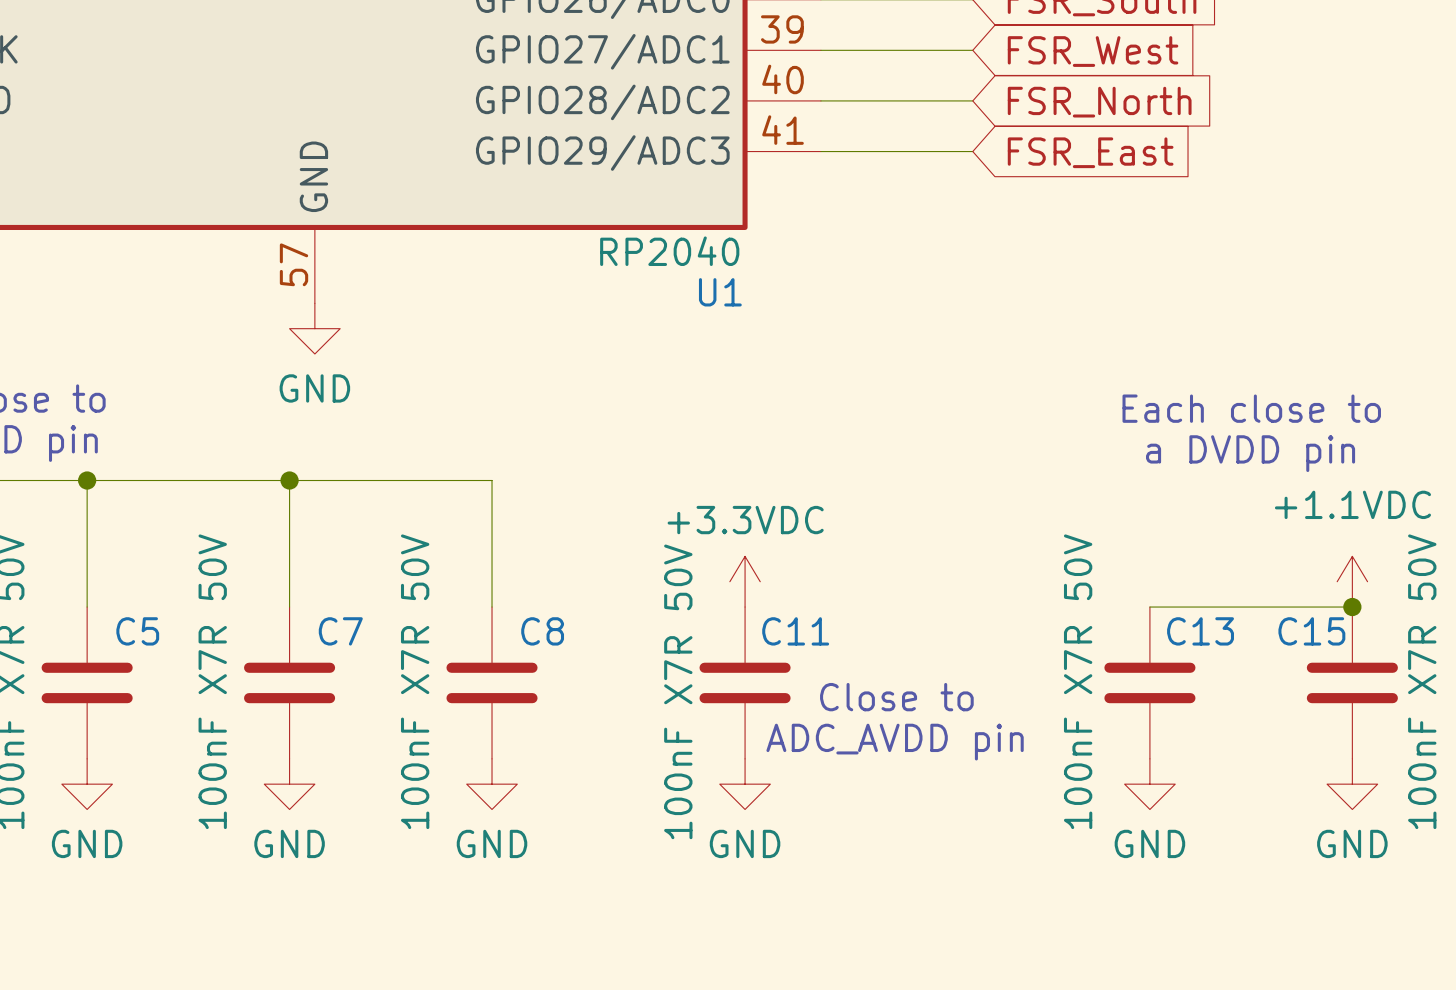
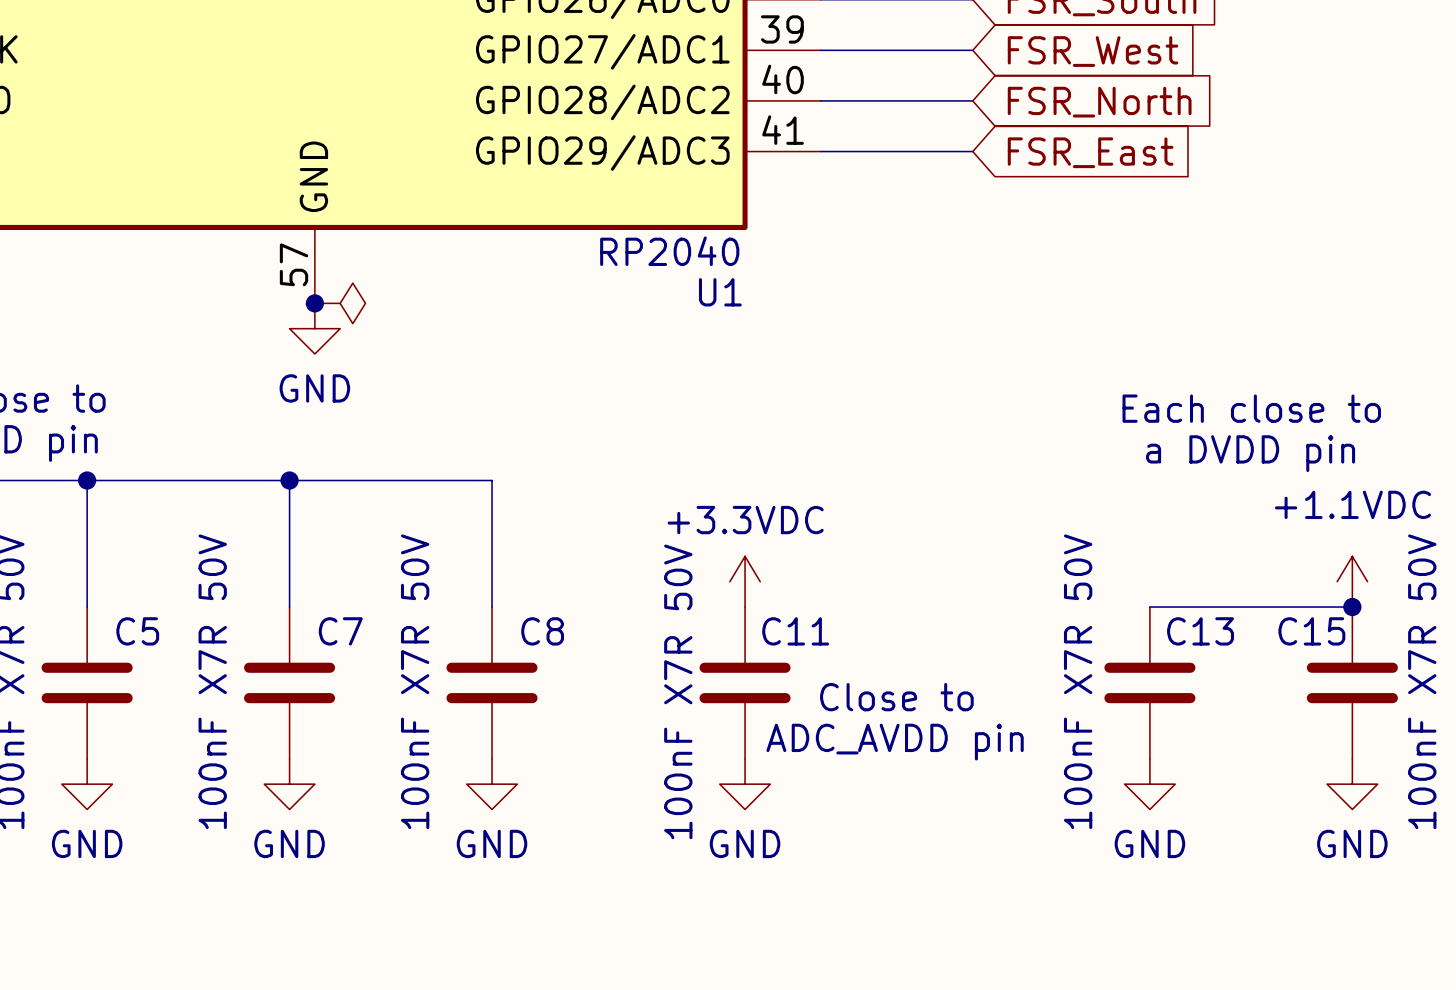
junction: none -> (314, 303)
power symbol: none -> (340, 303)

